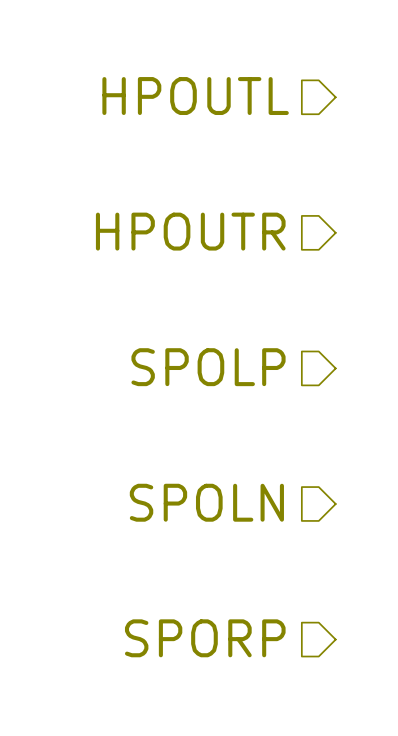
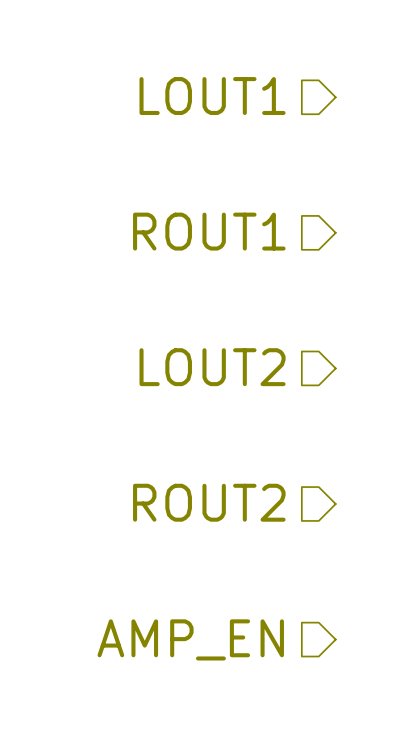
hierarchical label: HPOUTL (195, 96) -> LOUT1 (212, 96)
hierarchical label: HPOUTR (190, 231) -> ROUT1 (209, 231)
hierarchical label: SPOLP (208, 367) -> LOUT2 (212, 367)
hierarchical label: SPOLN (206, 502) -> ROUT2 (209, 502)
hierarchical label: SPORP (205, 638) -> AMP_EN (190, 639)

